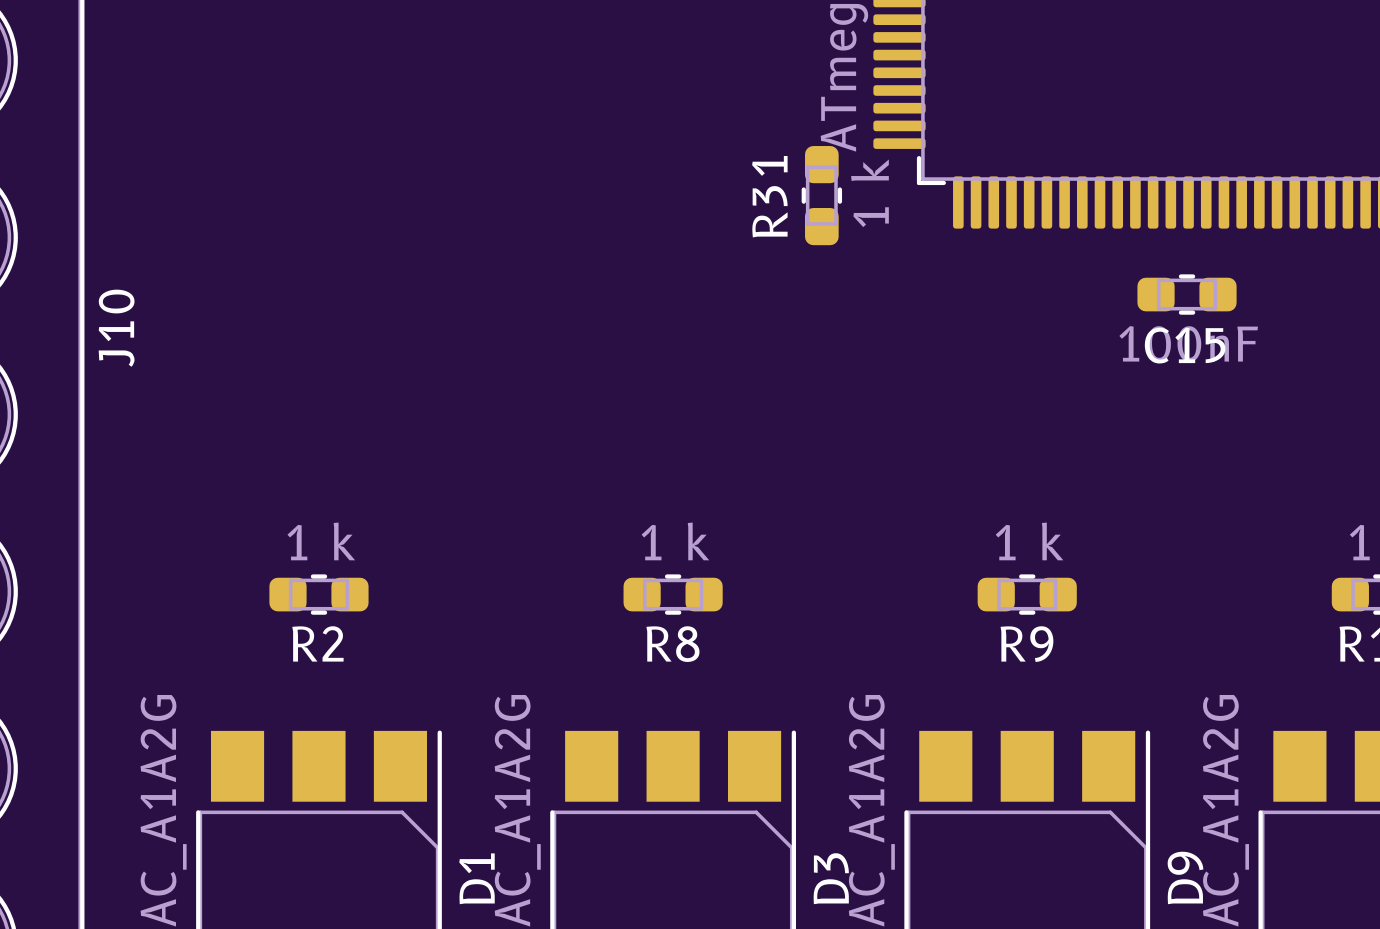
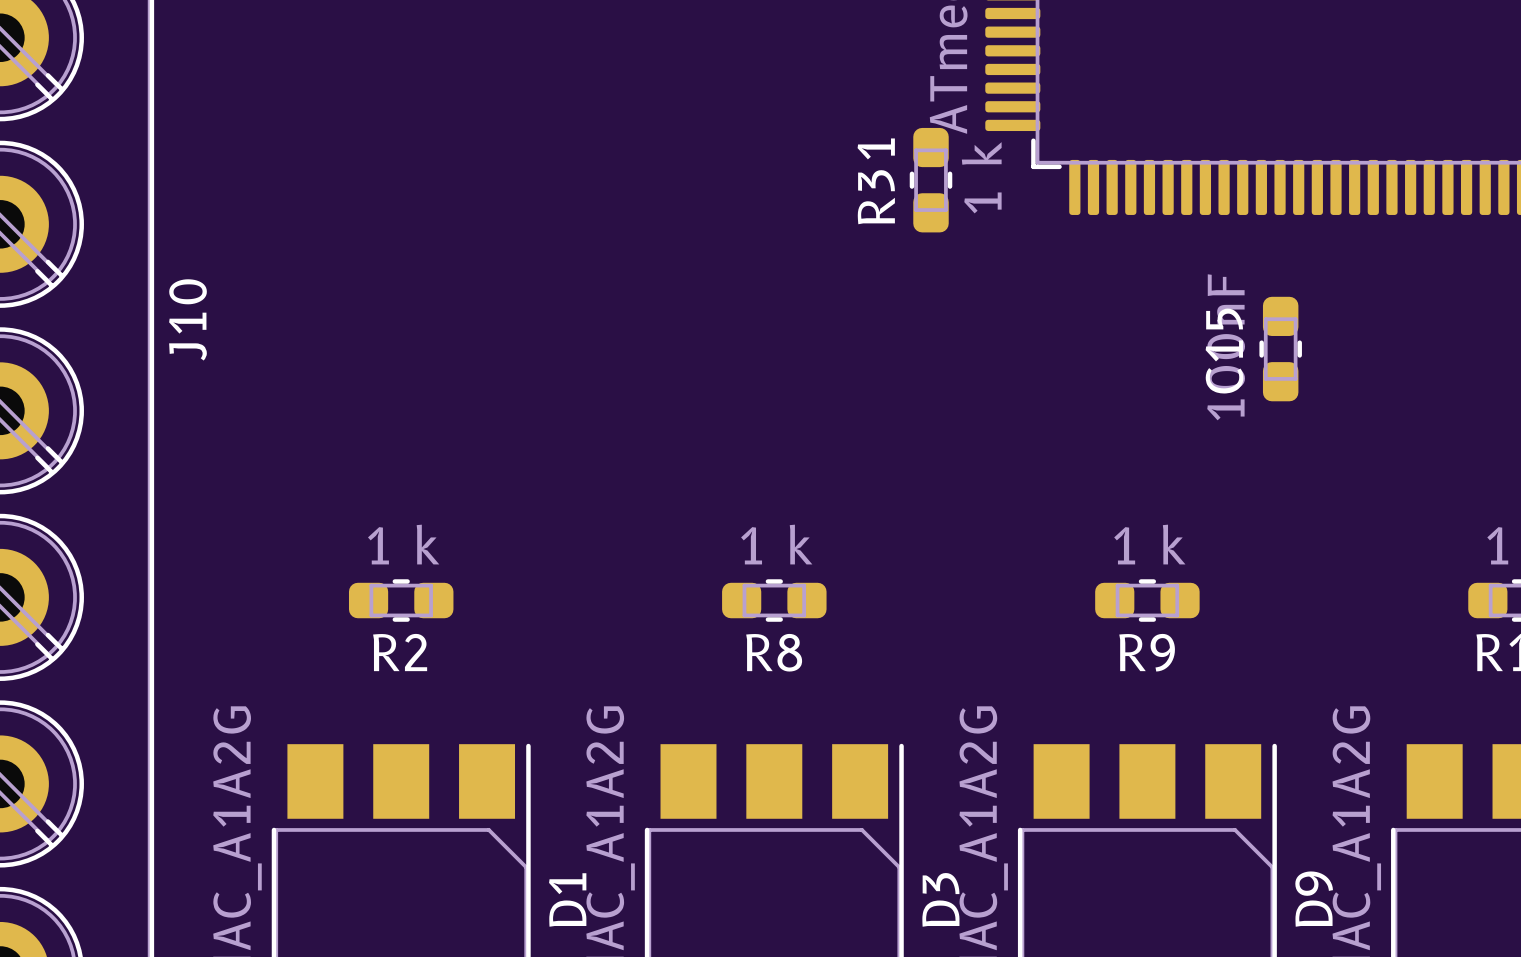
C15 rotation: 0° (1187, 294) -> 90° clockwise (1280, 349)
C15 position: (1187, 294) -> (1280, 349)

